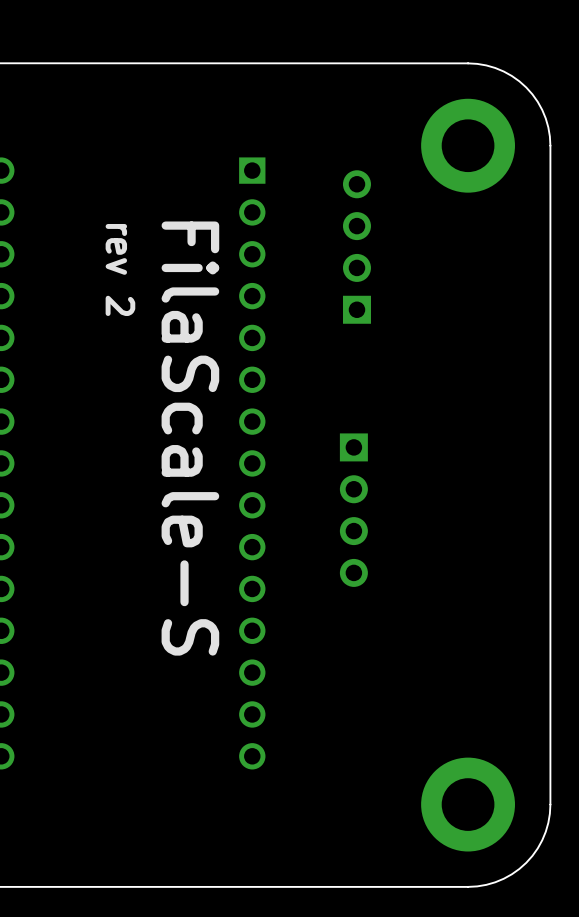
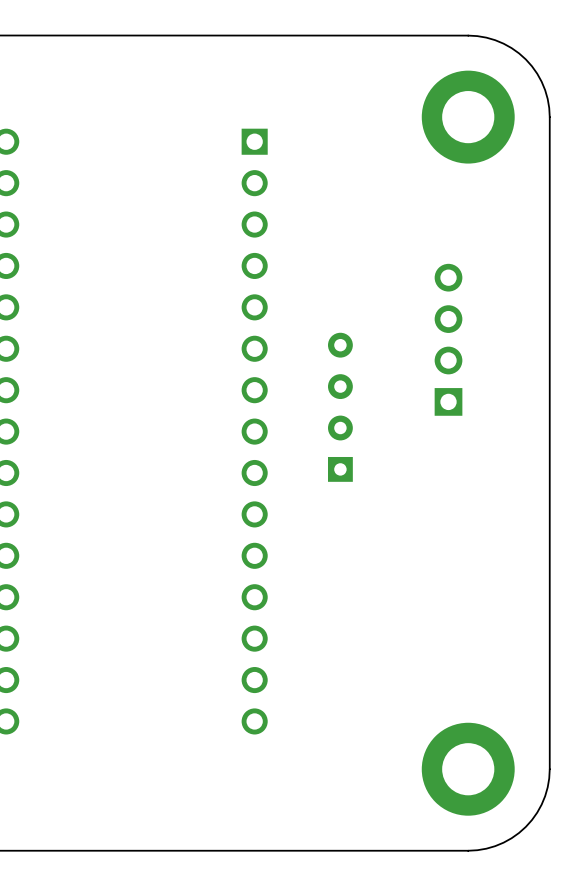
part: (356, 247) -> none
text: rev 2 (120, 269) -> none
part: none -> (448, 339)
text: FilaScale-S (190, 438) -> none
part: none -> (340, 407)
part: (353, 510) -> none

